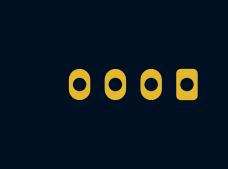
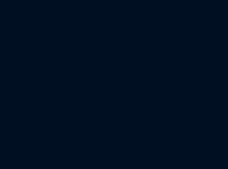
part: (133, 84) -> none

